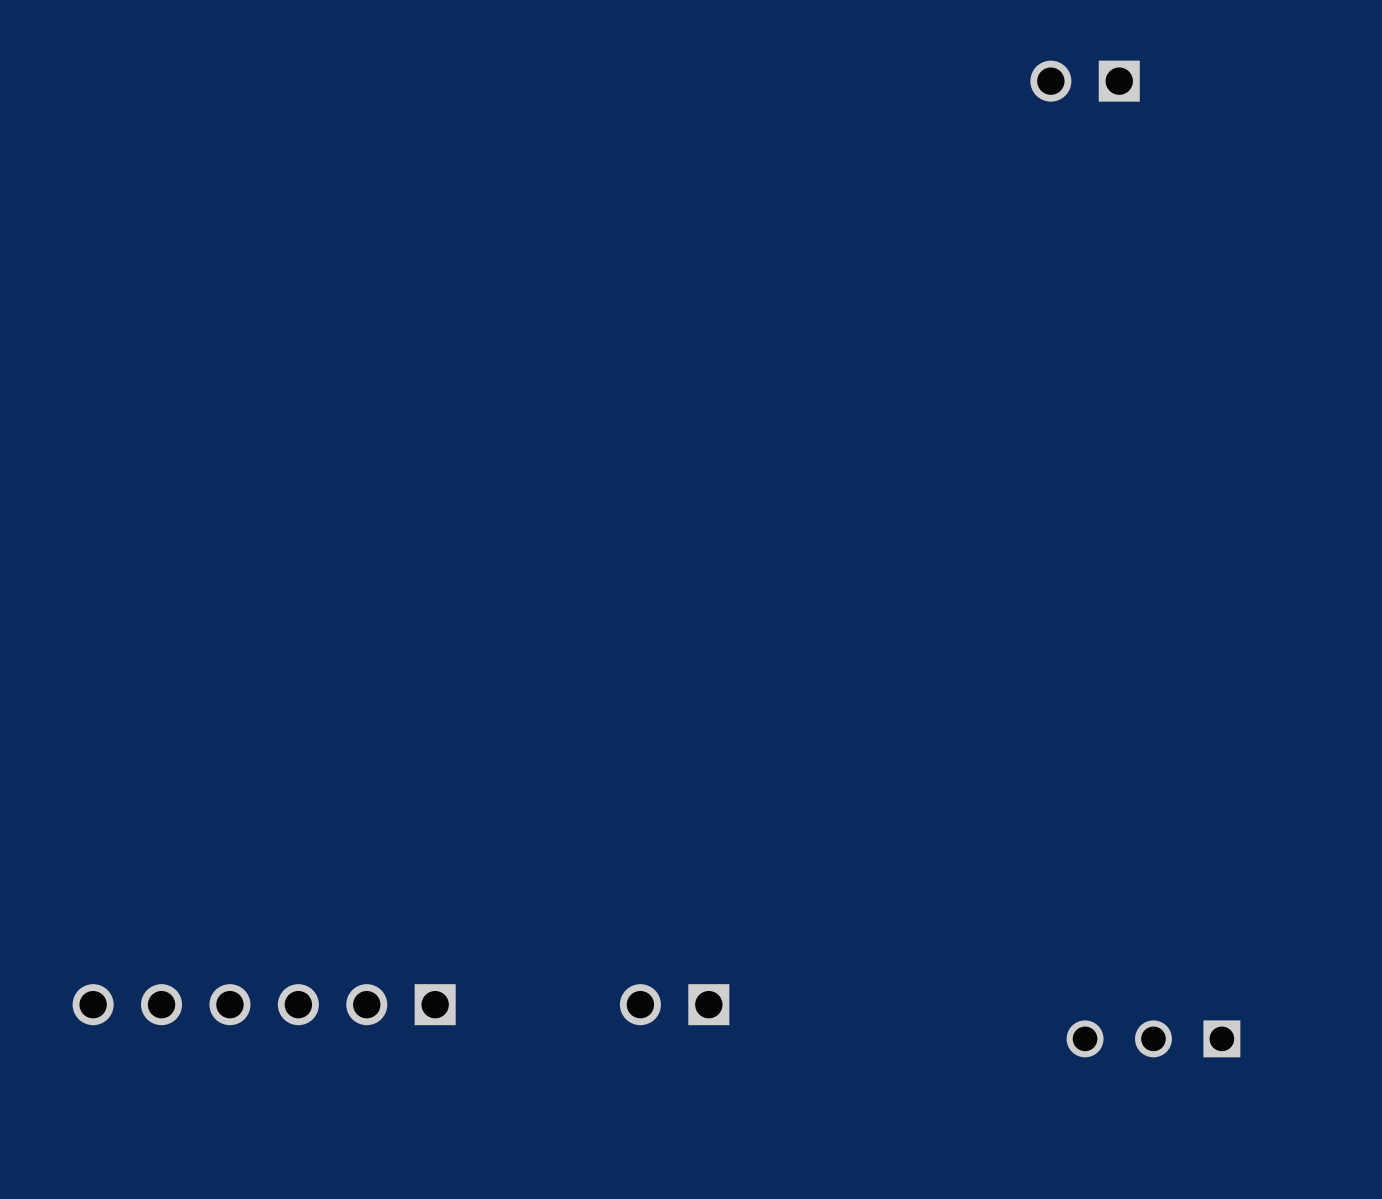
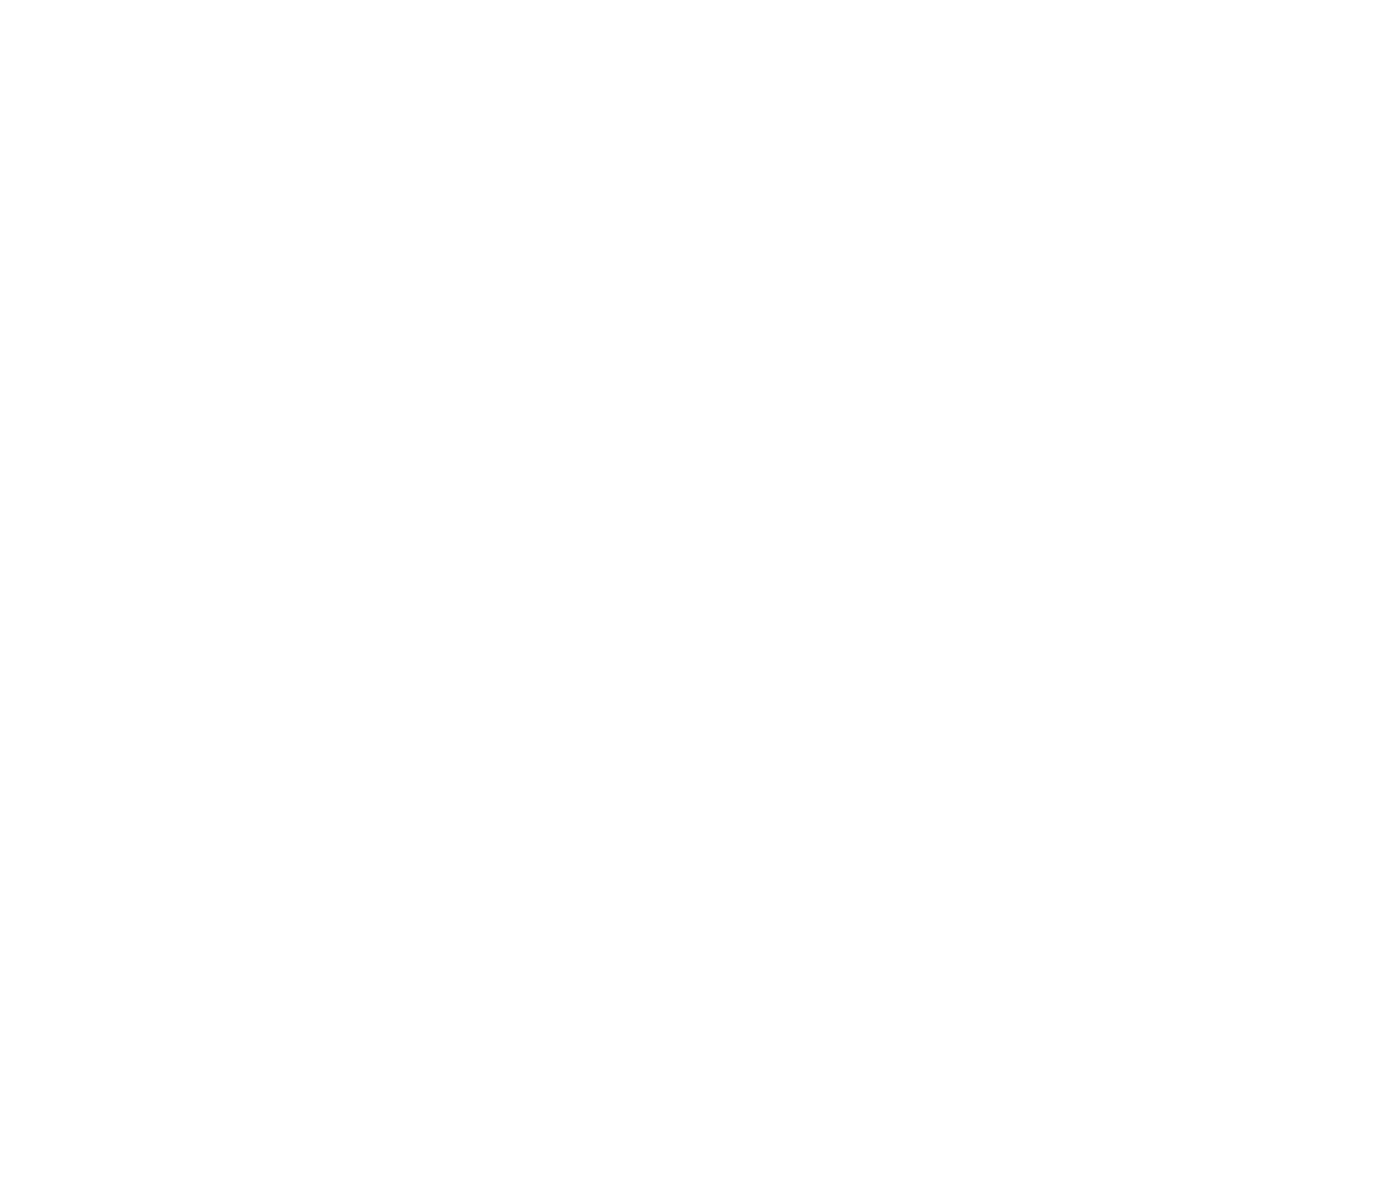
part: (1085, 81) -> none
part: (264, 1004) -> none
part: (674, 1004) -> none
part: (1153, 1038) -> none

